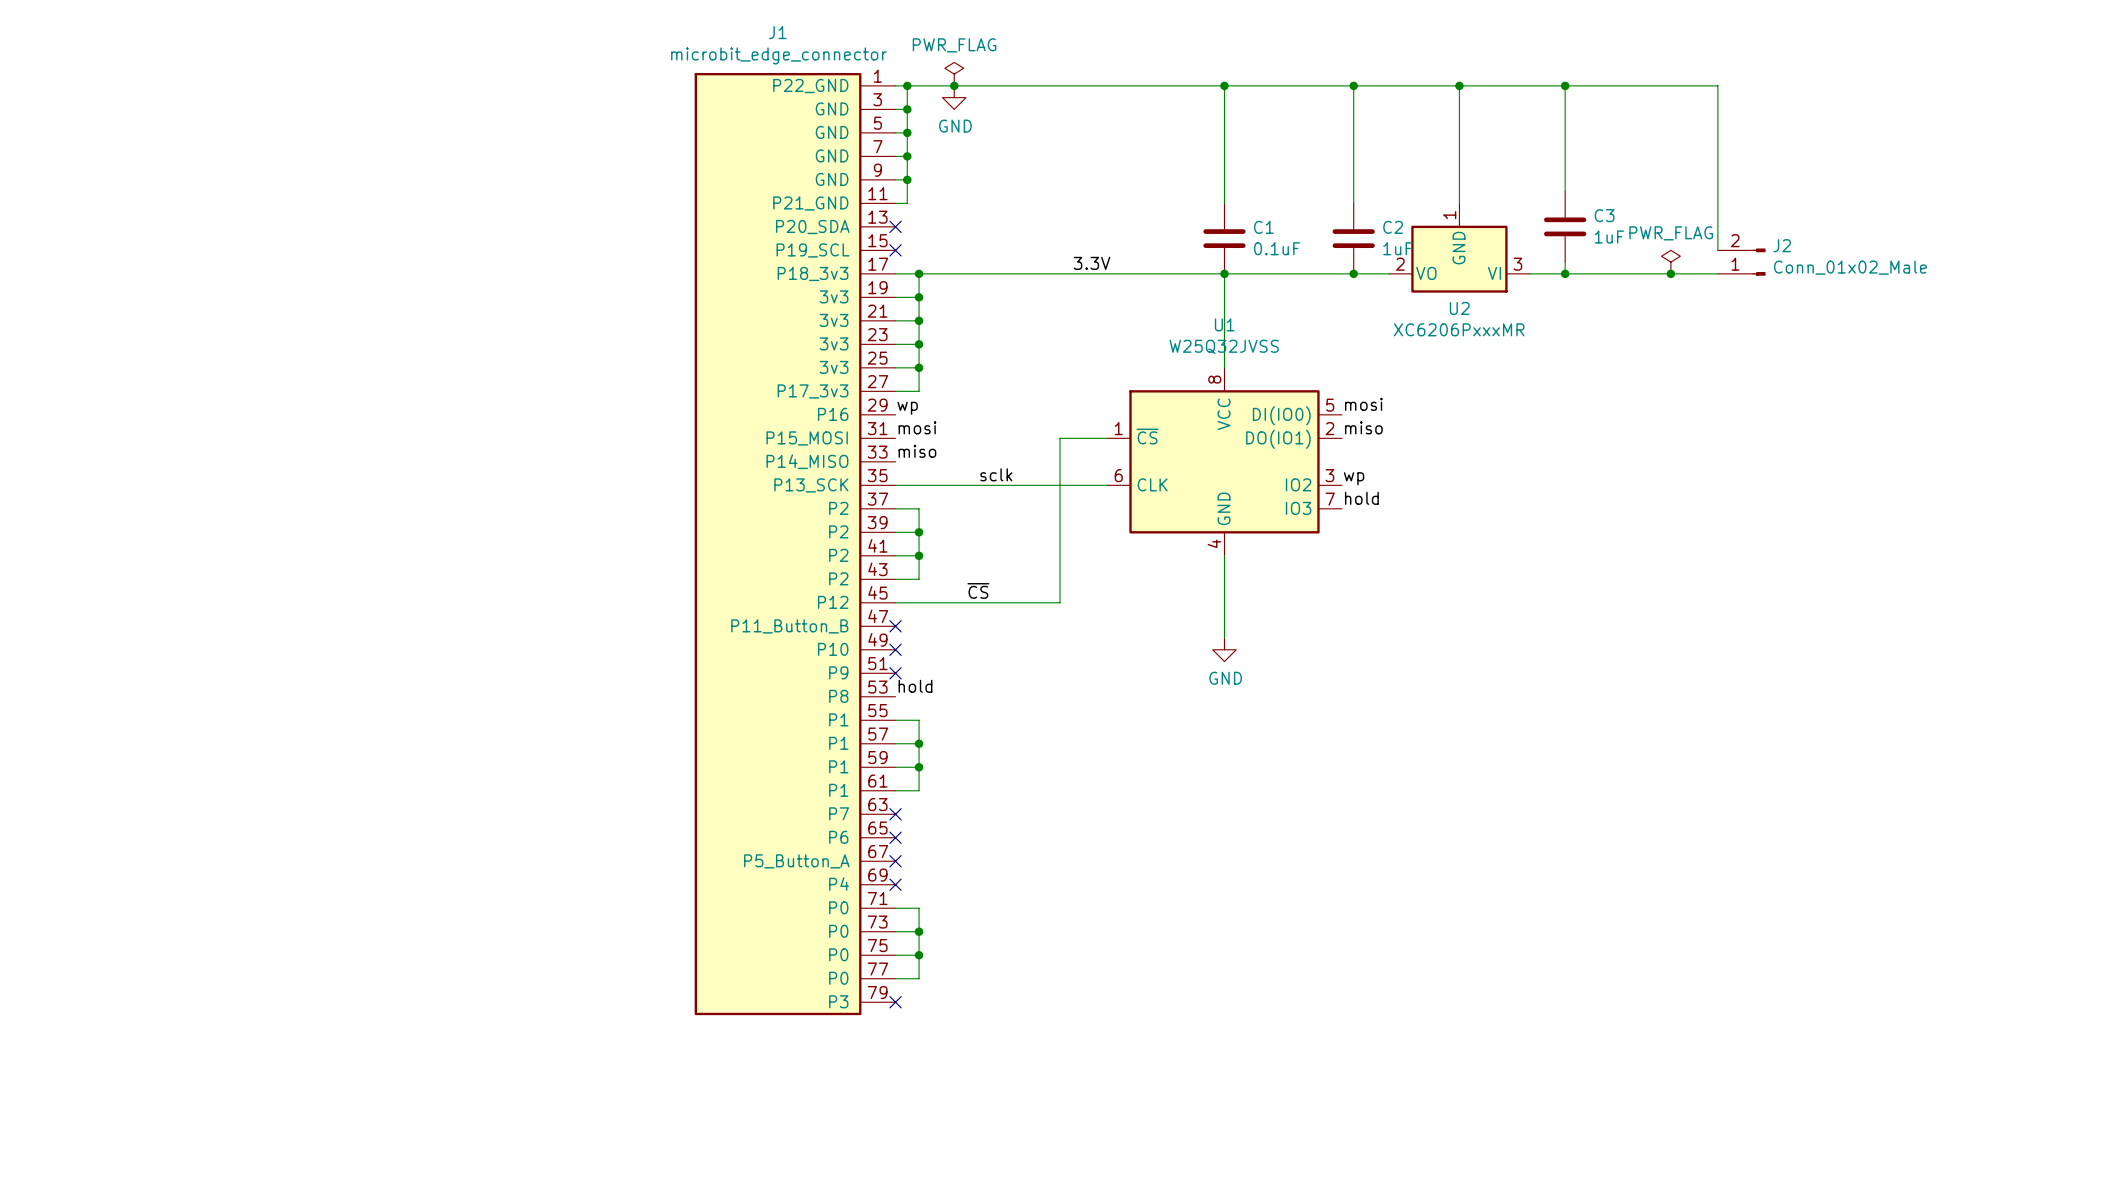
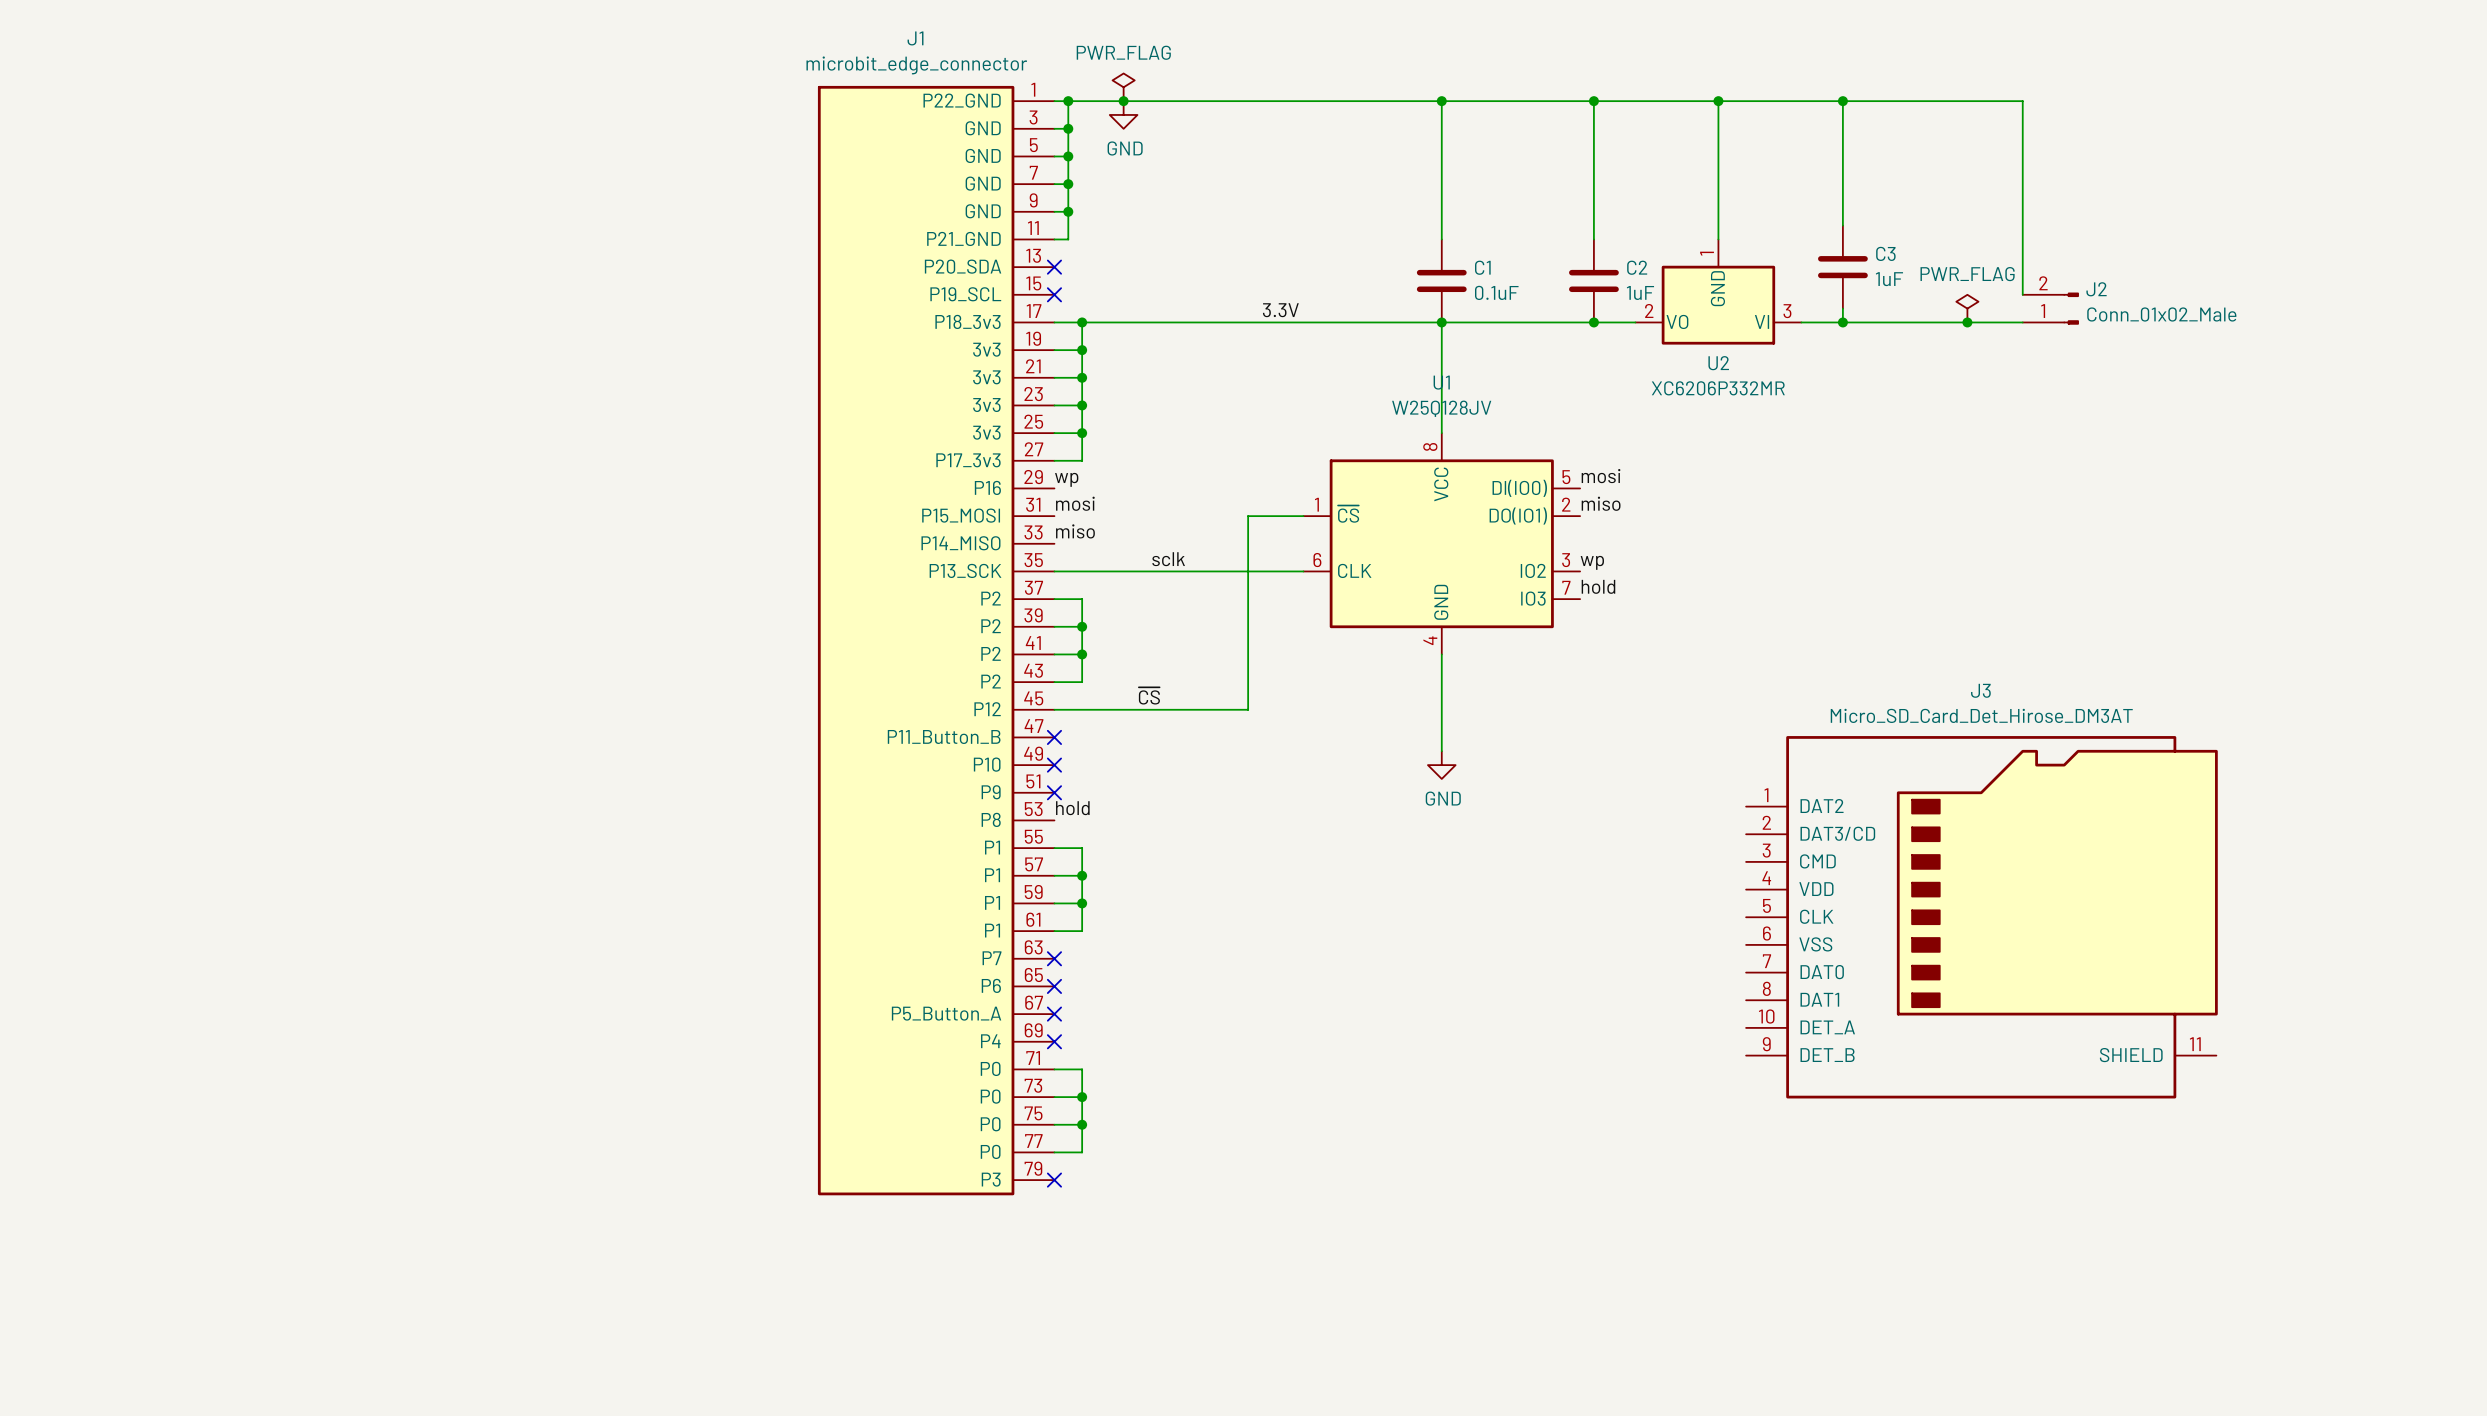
U2 value: XC6206PxxxMR (1459, 329) -> XC6206P332MR (1718, 388)
U1 value: W25Q32JVSS (1224, 346) -> W25Q128JV (1441, 408)
J3: none -> Micro_SD_Card_Det_Hirose_DM3AT (1981, 917)

